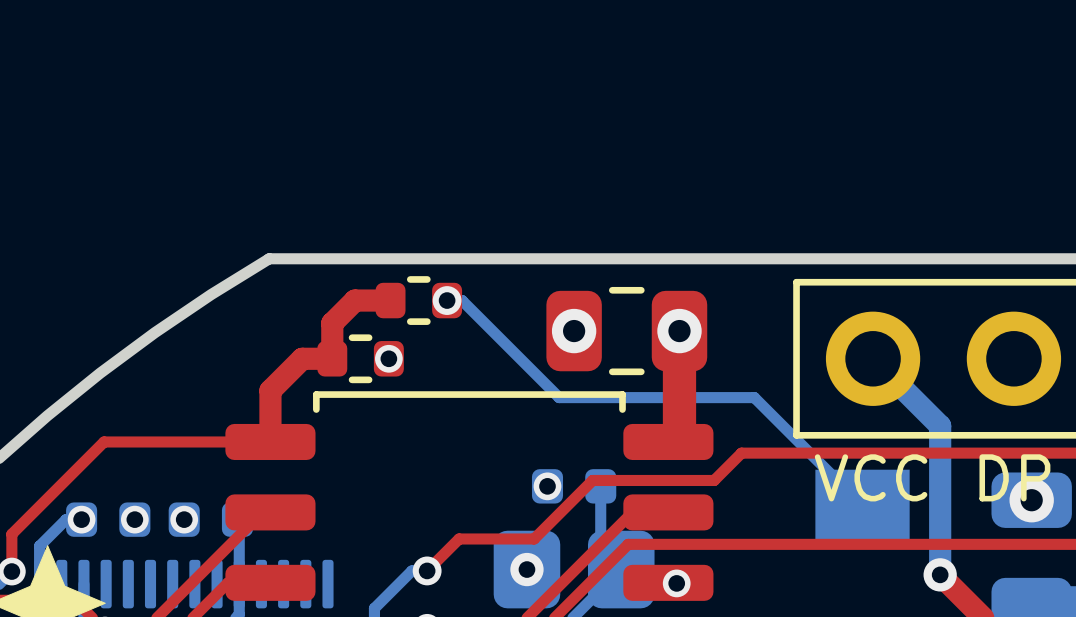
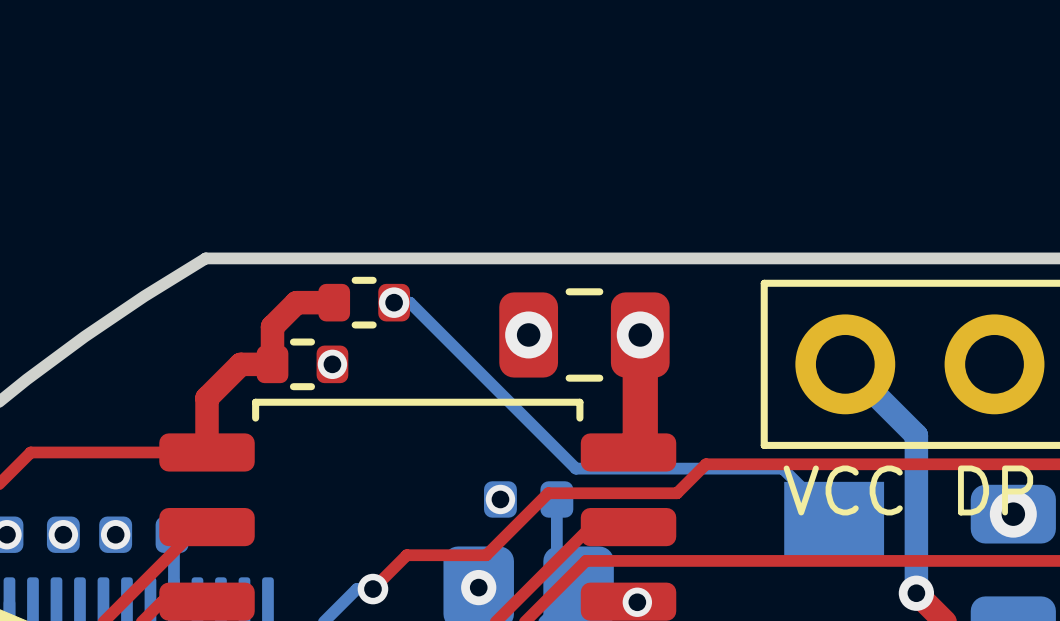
bottom track: (559, 397) (754, 397) (813, 457) -> (512, 405) (575, 468) (782, 468)

